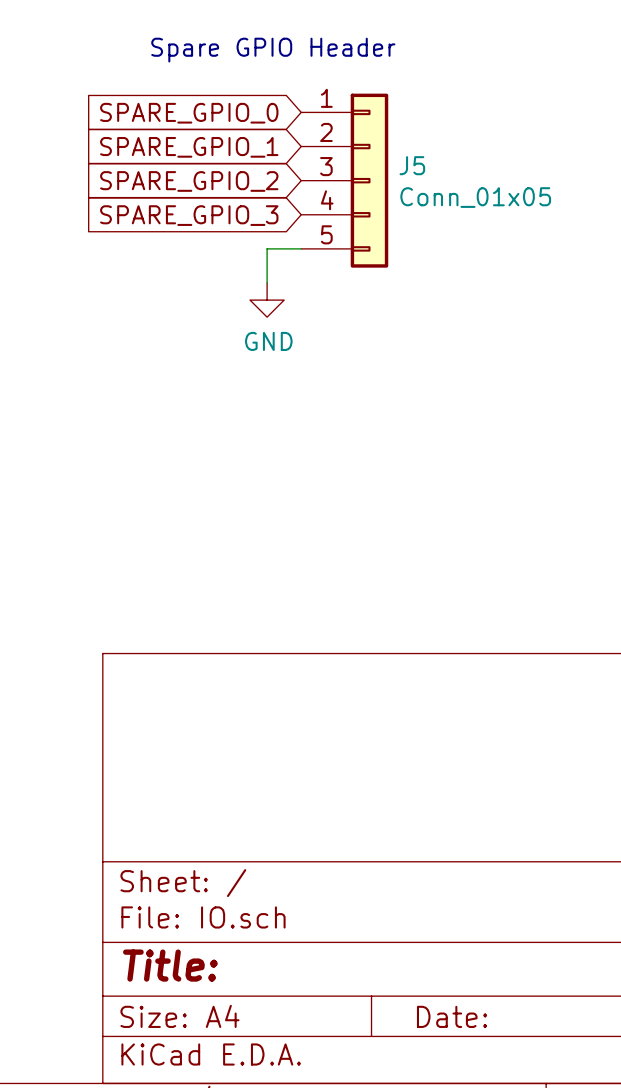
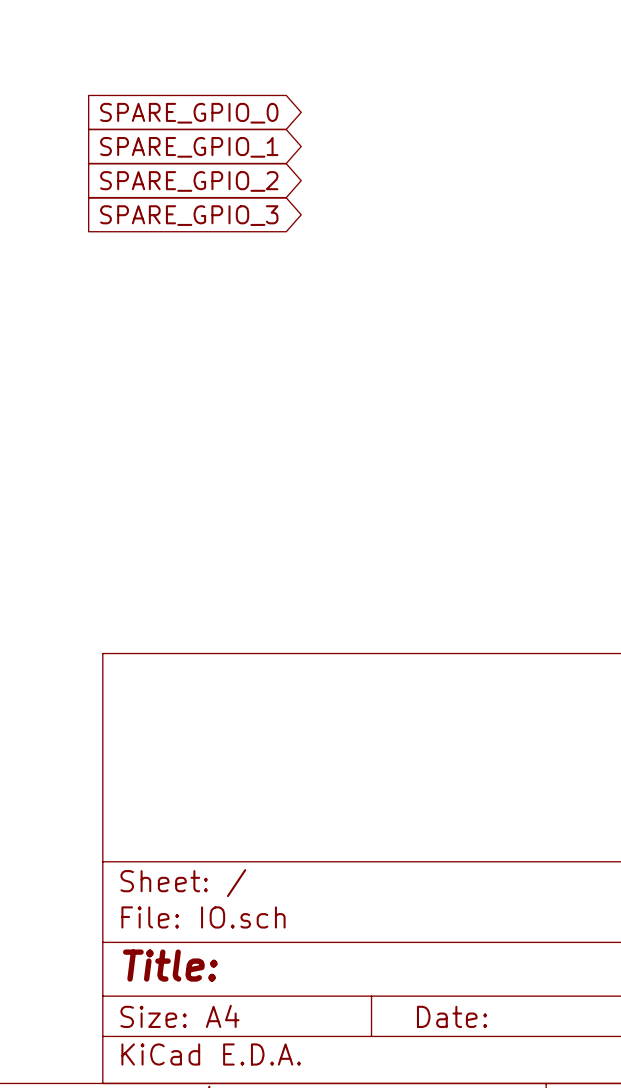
text: Spare GPIO Header (273, 50) -> none
J5: Conn_01x05 (344, 180) -> none
wire: (301, 248) (267, 248) (267, 283) -> none
power symbol: GND (267, 300) -> none

